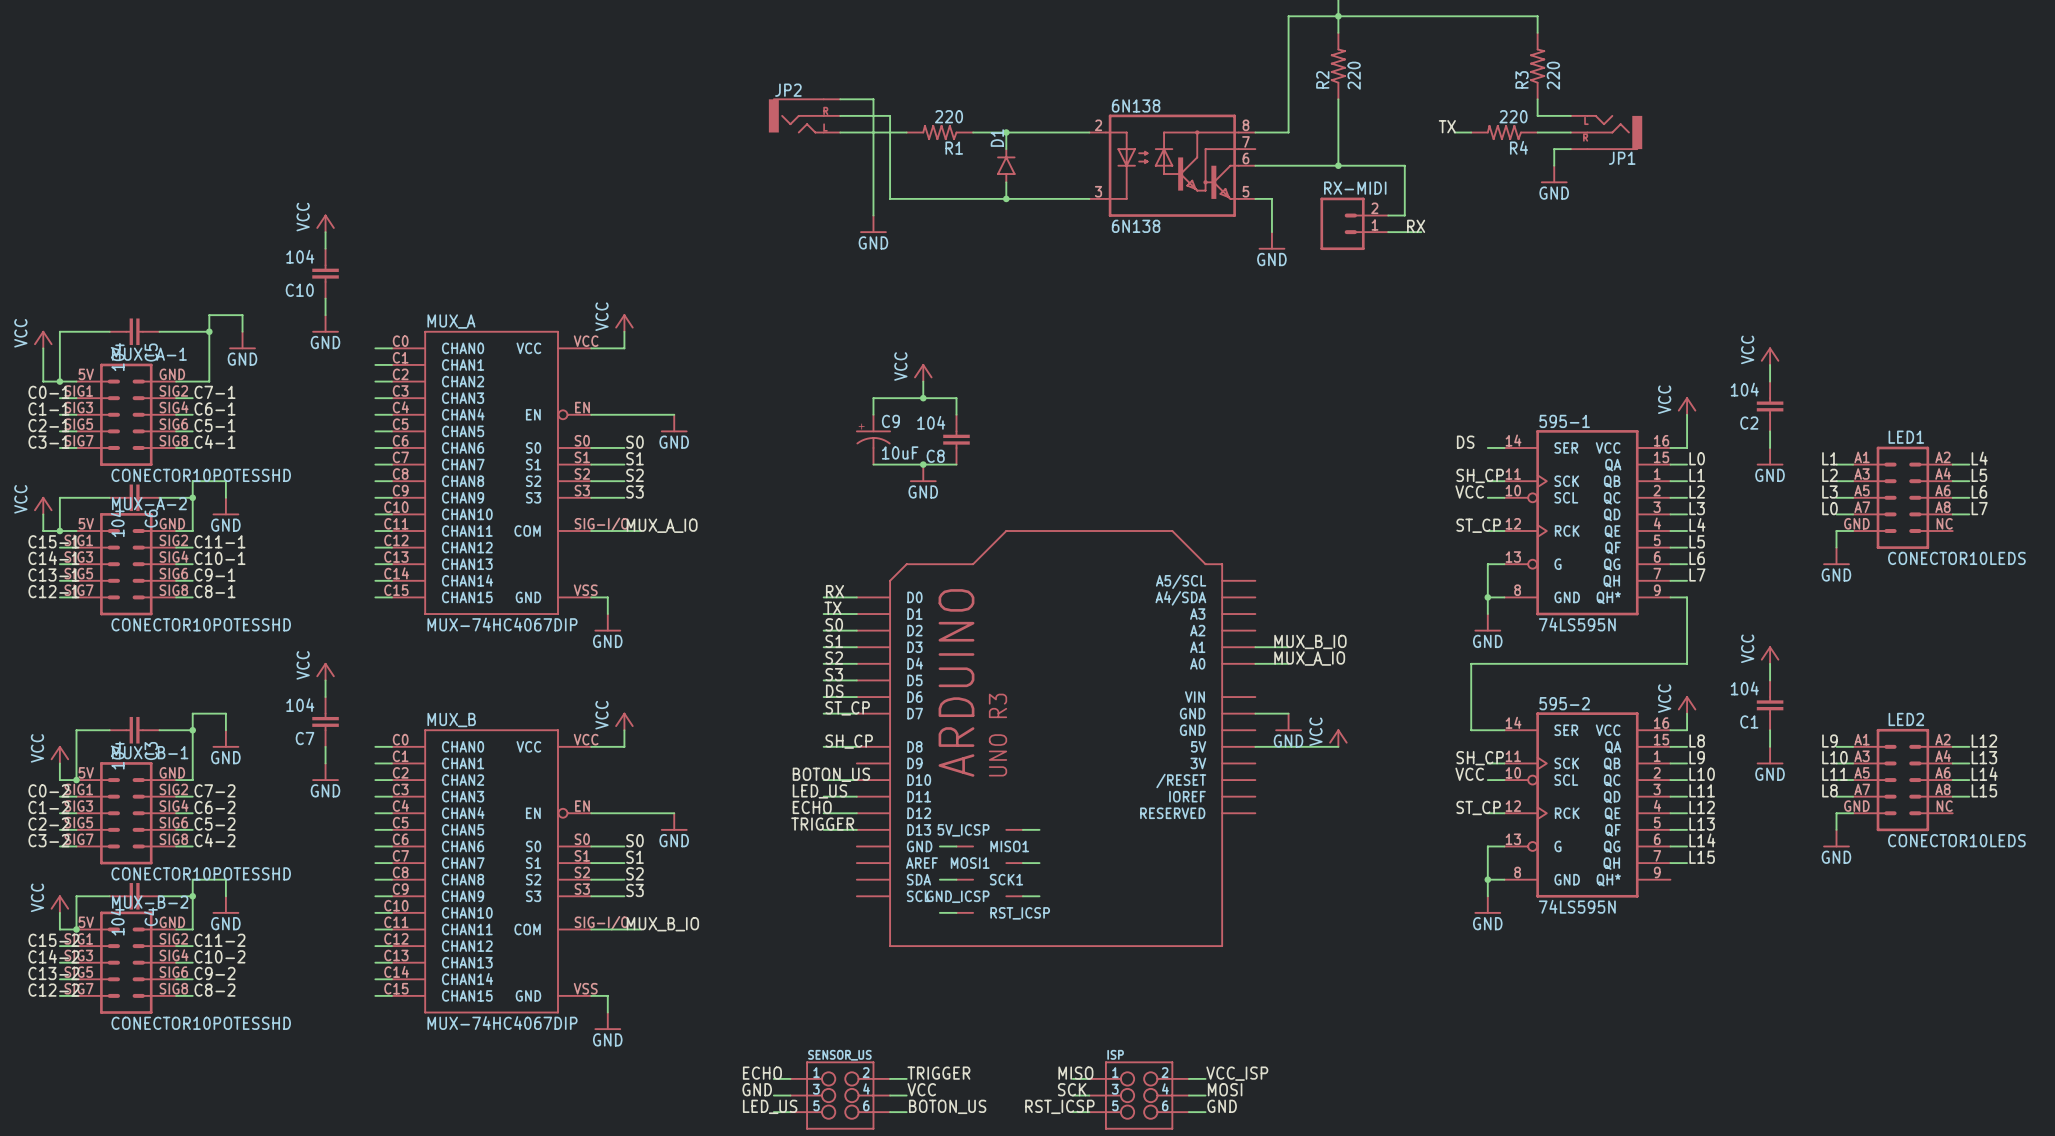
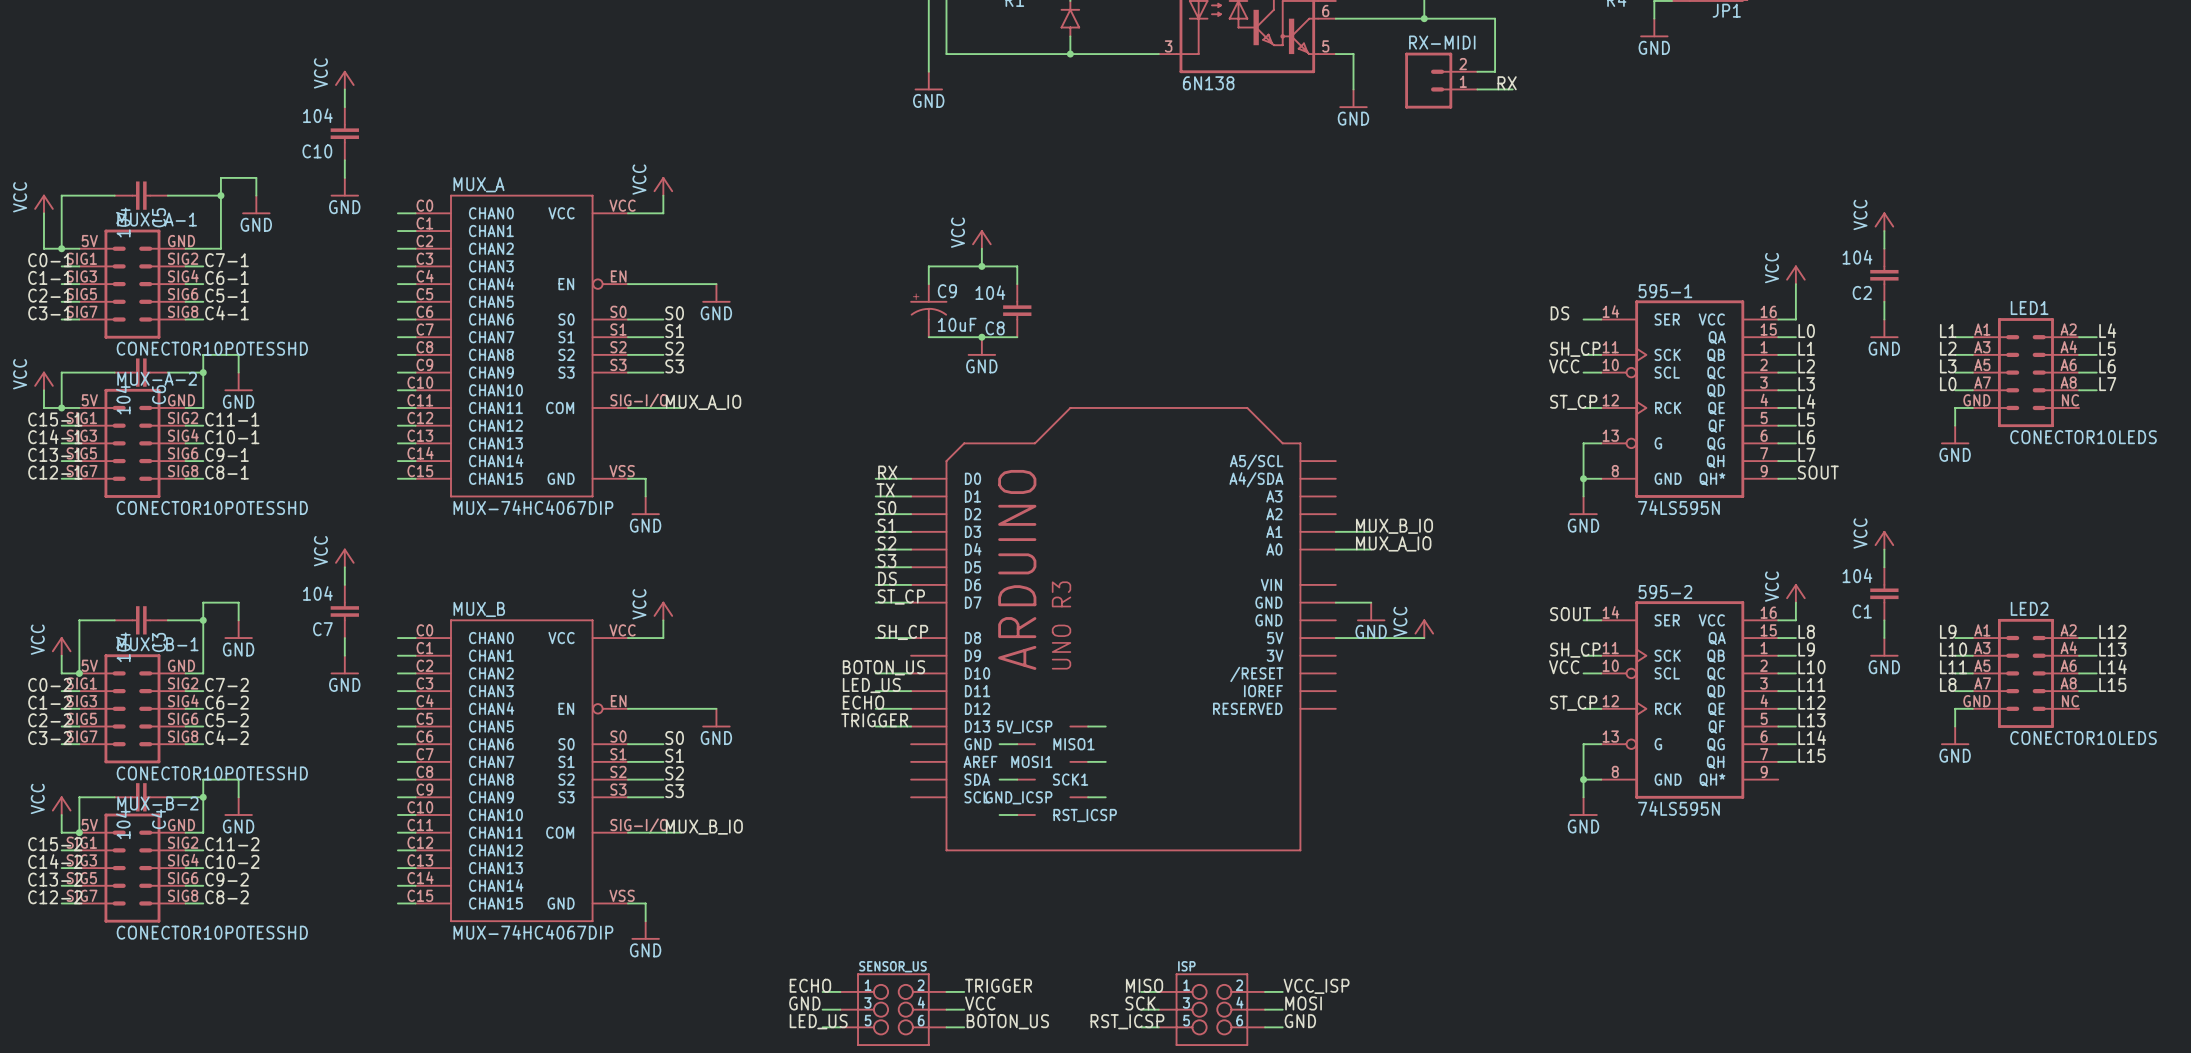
label: none -> SOUT (1818, 472)
wire: (1687, 597) (1687, 663) (1471, 663) (1471, 730) (1487, 730) -> none
label: none -> SOUT (1570, 614)

